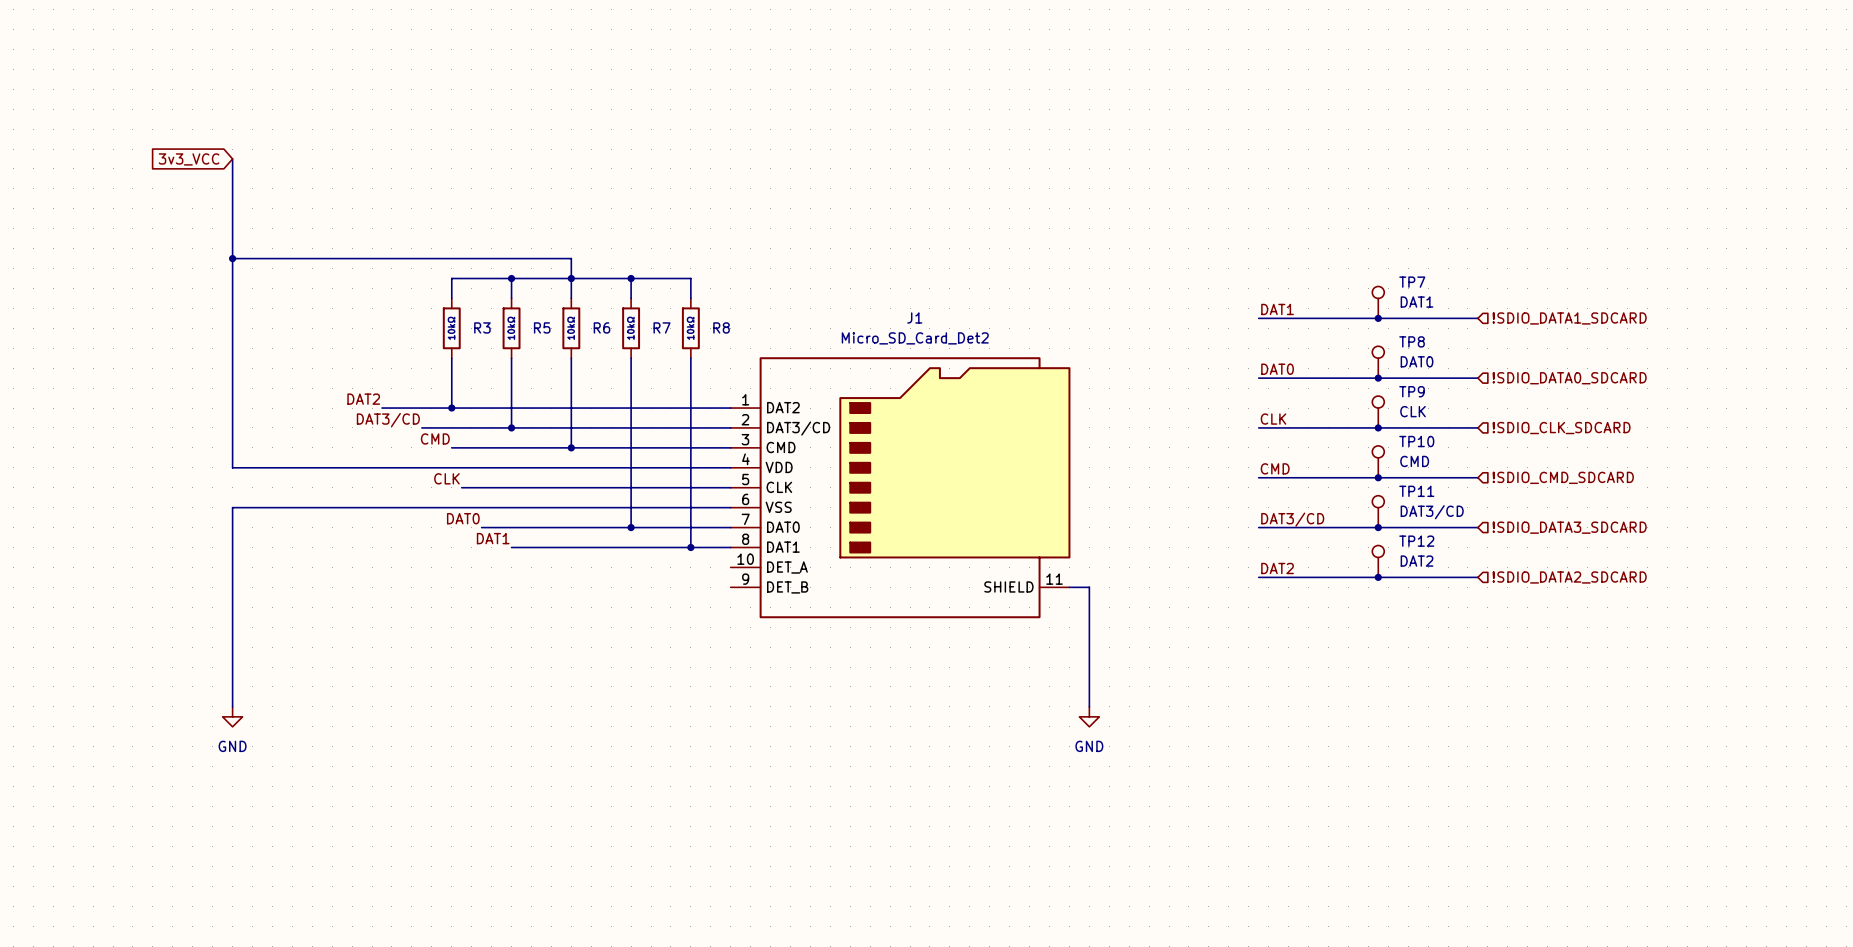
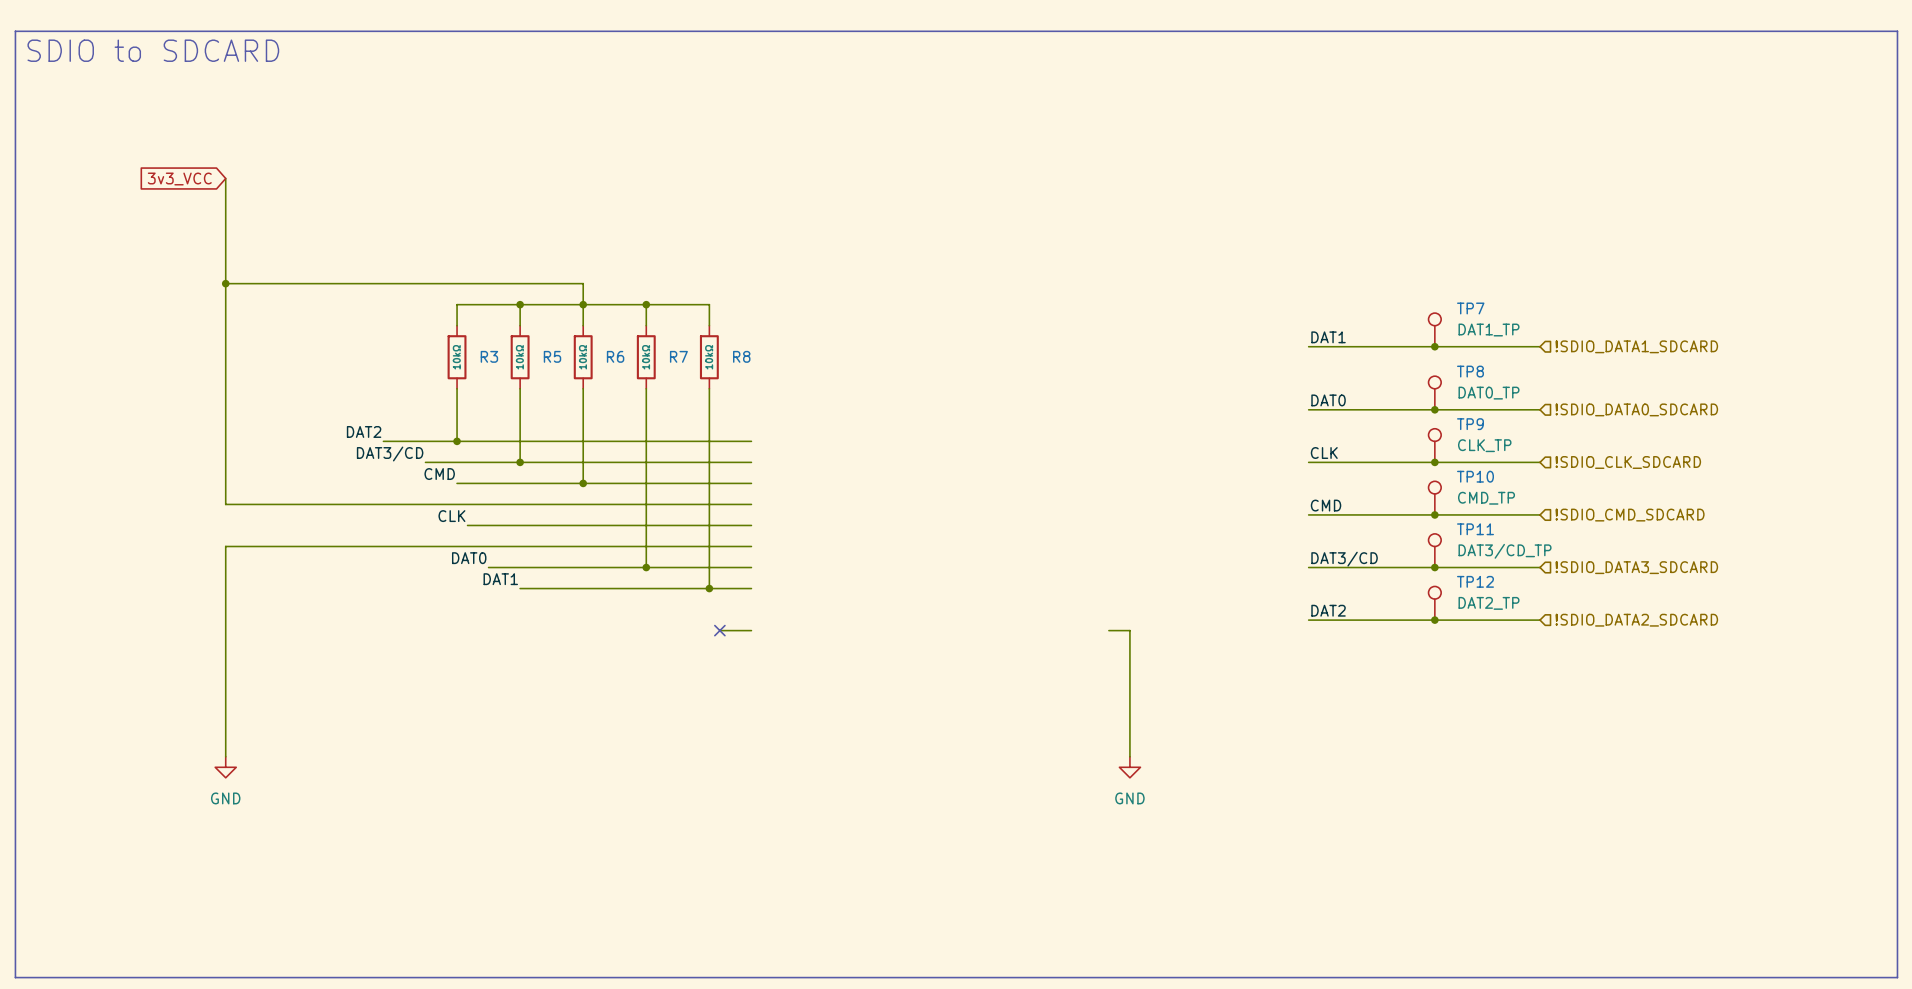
line: none -> (15, 31) (1897, 31) (1897, 977) (15, 977) (15, 31)
text: none -> SDIO to SDCARD (153, 50)
TP7 value: DAT1 (1417, 302) -> DAT1_TP (1489, 330)
TP8 value: DAT0 (1417, 361) -> DAT0_TP (1489, 393)
TP9 value: CLK (1412, 411) -> CLK_TP (1484, 445)
TP10 value: CMD (1414, 461) -> CMD_TP (1486, 498)
J1: Micro_SD_Card_Det2 (900, 487) -> none
TP11 value: DAT3/CD (1432, 512) -> DAT3/CD_TP (1505, 551)
TP12 value: DAT2 (1417, 561) -> DAT2_TP (1489, 603)
wire: none -> (719, 630) (751, 630)
no-connect mark: none -> (719, 630)

